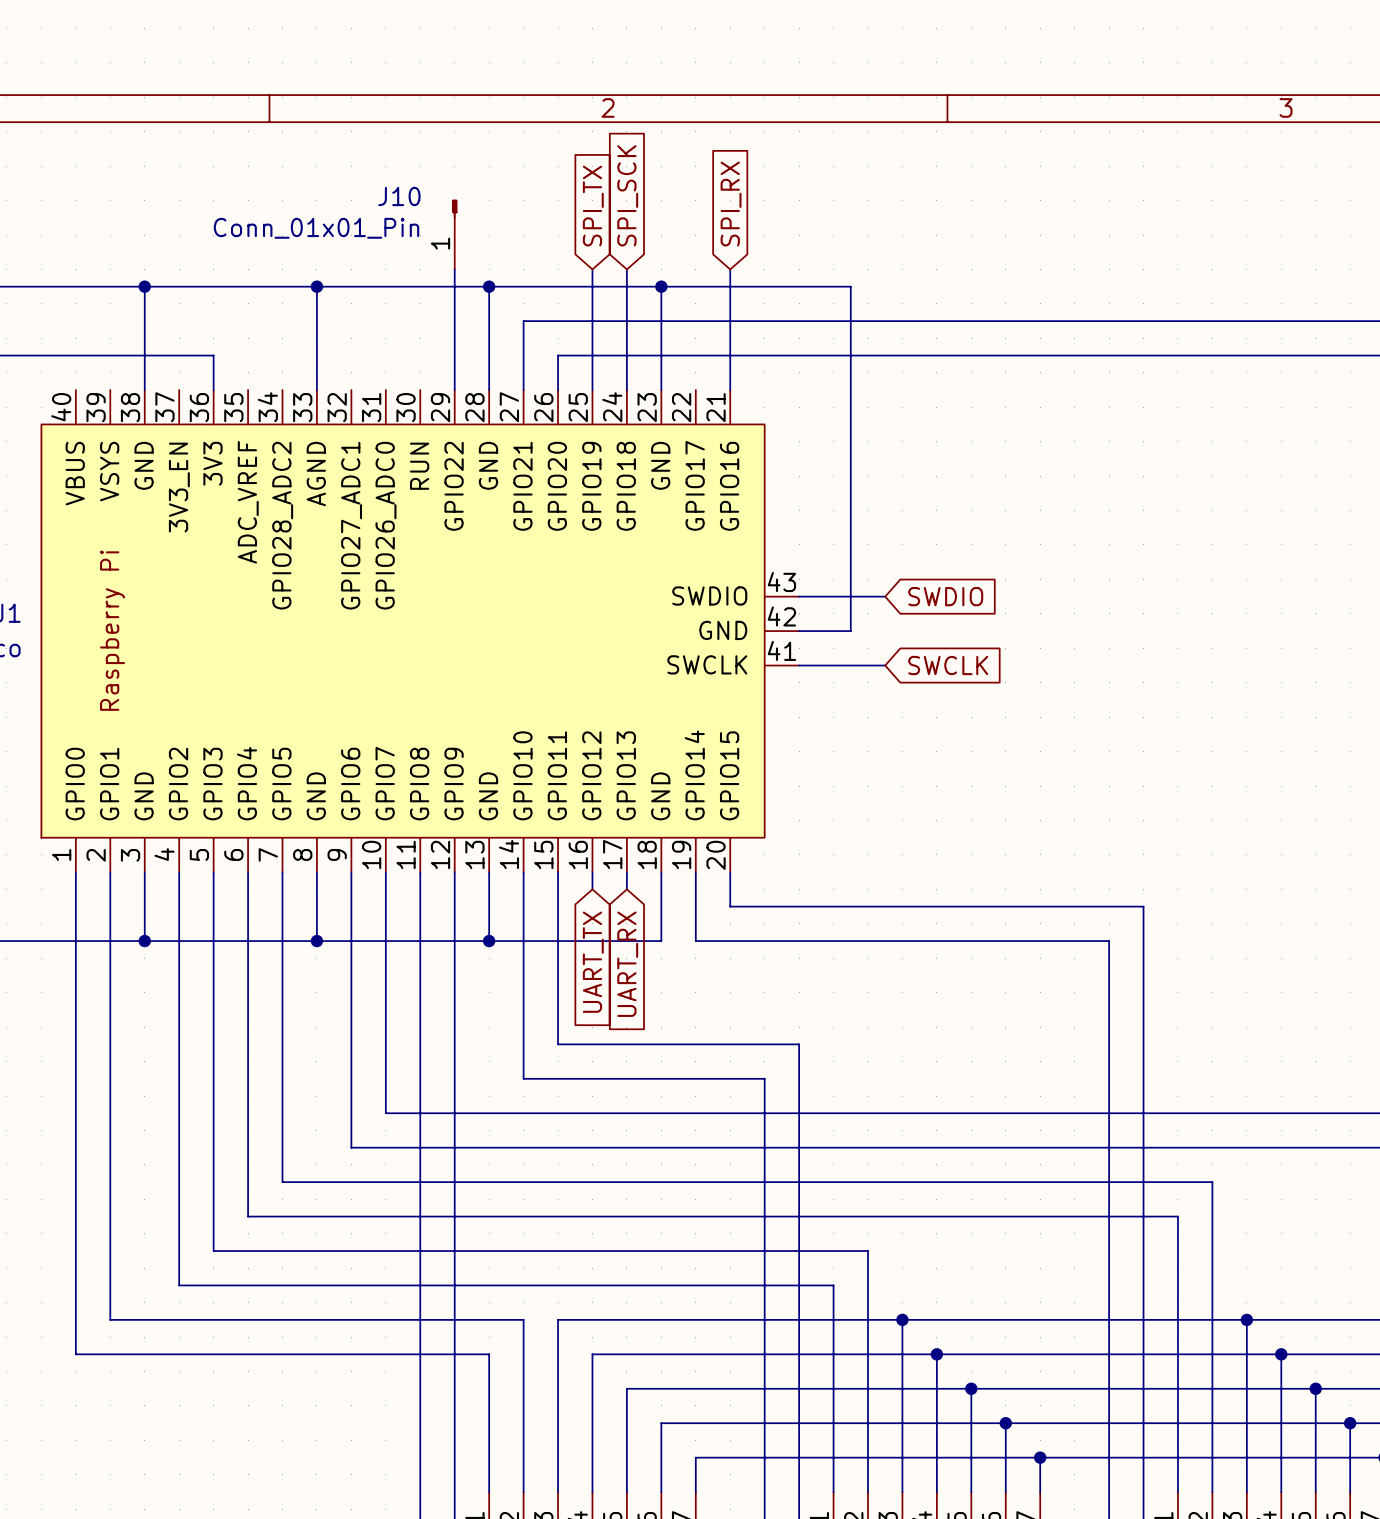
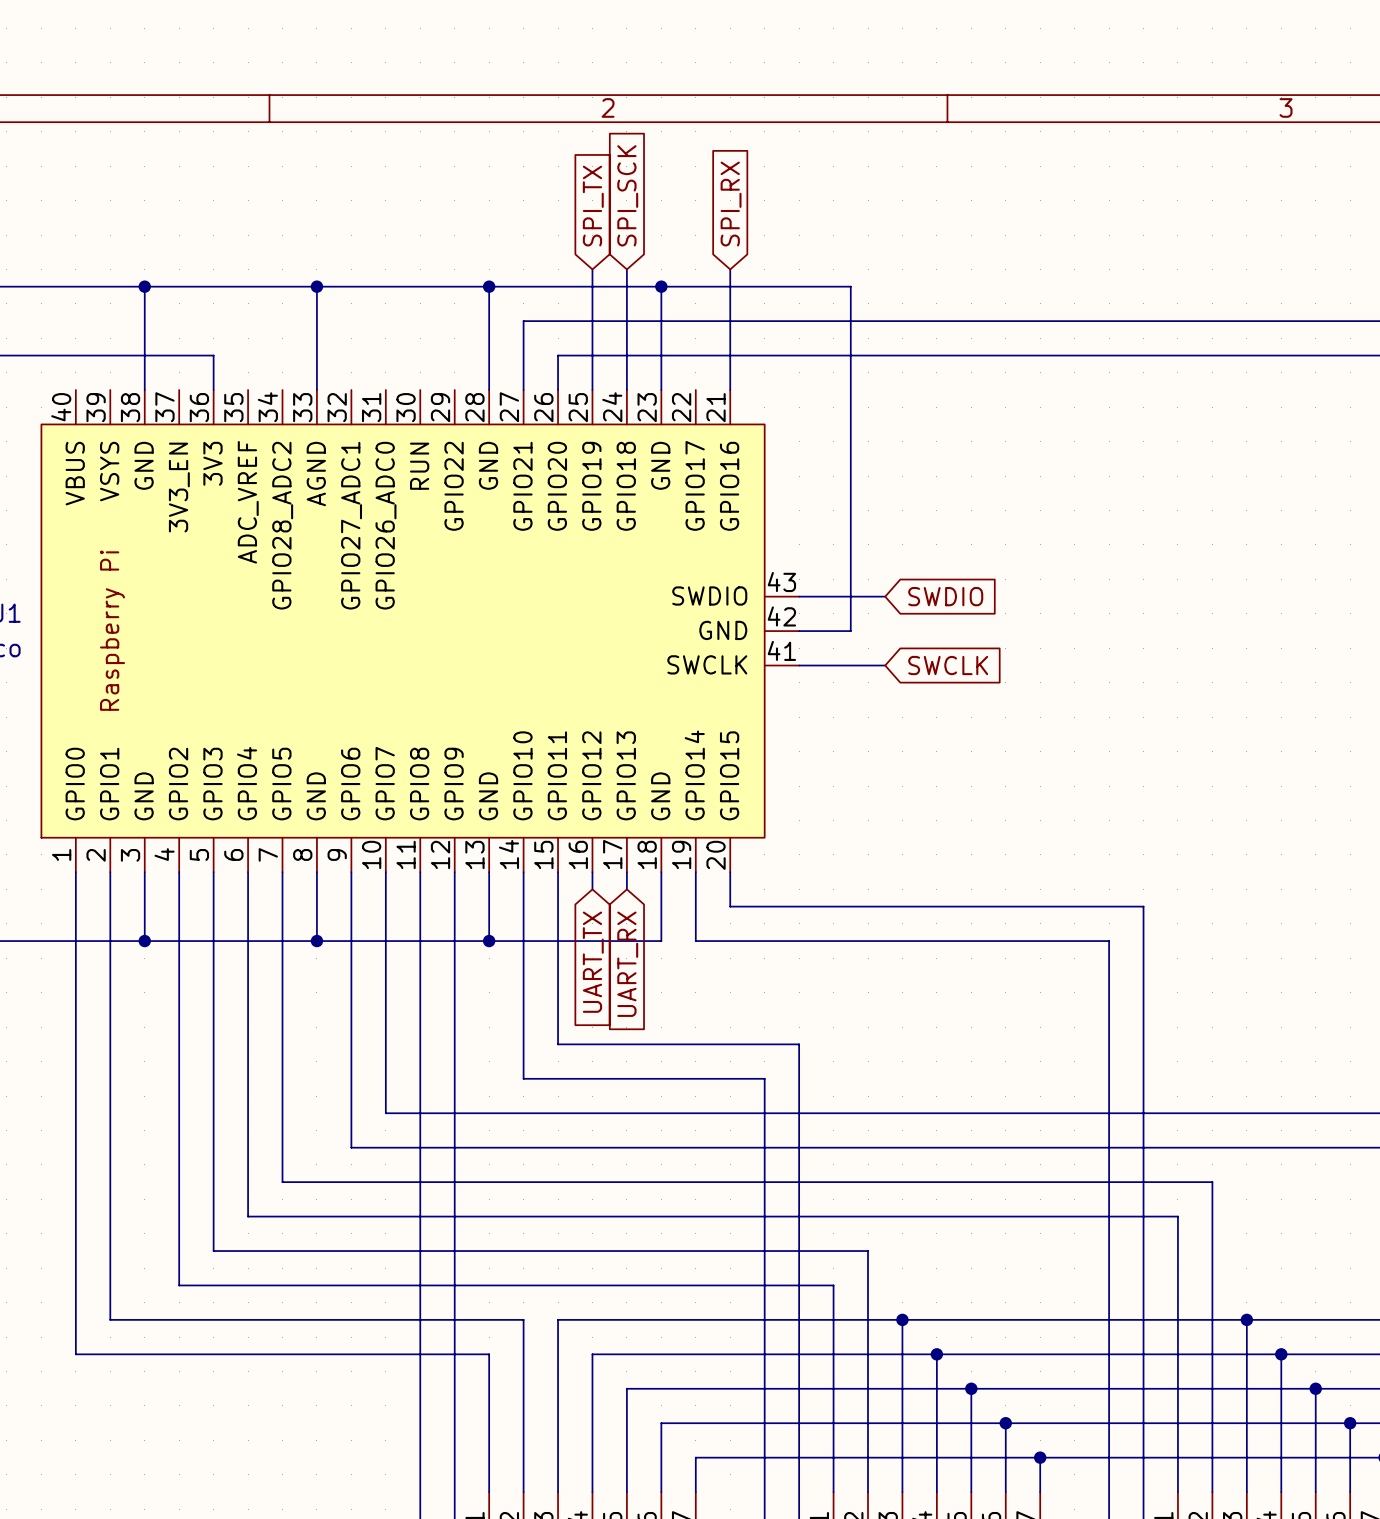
J10: Conn_01x01_Pin (454, 234) -> none
wire: (454, 269) (454, 389) -> none

